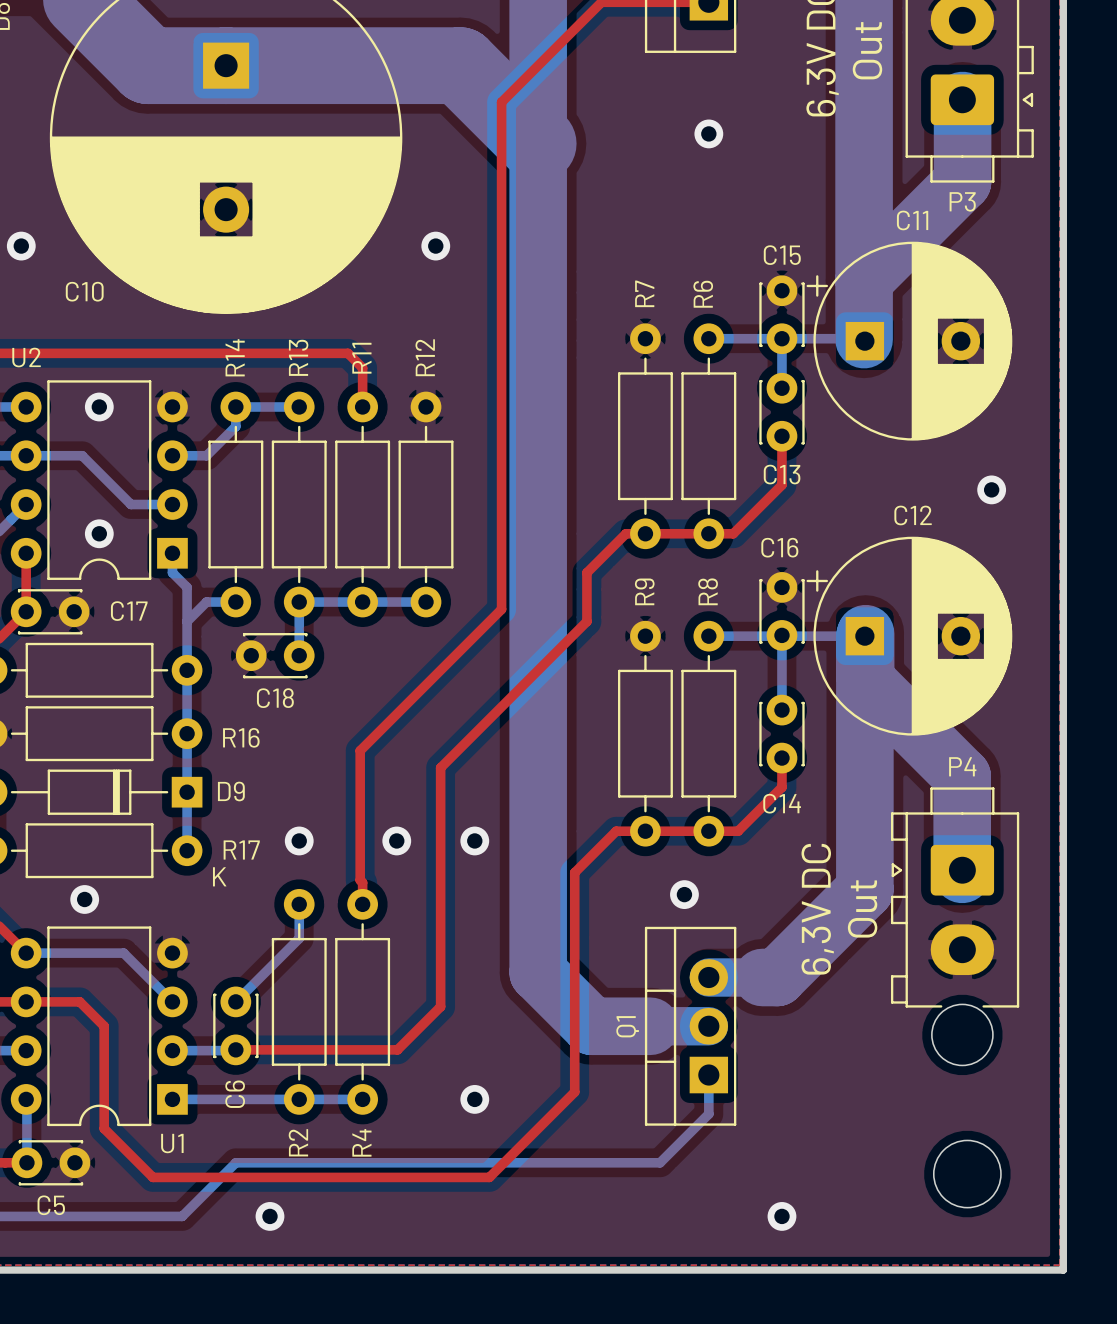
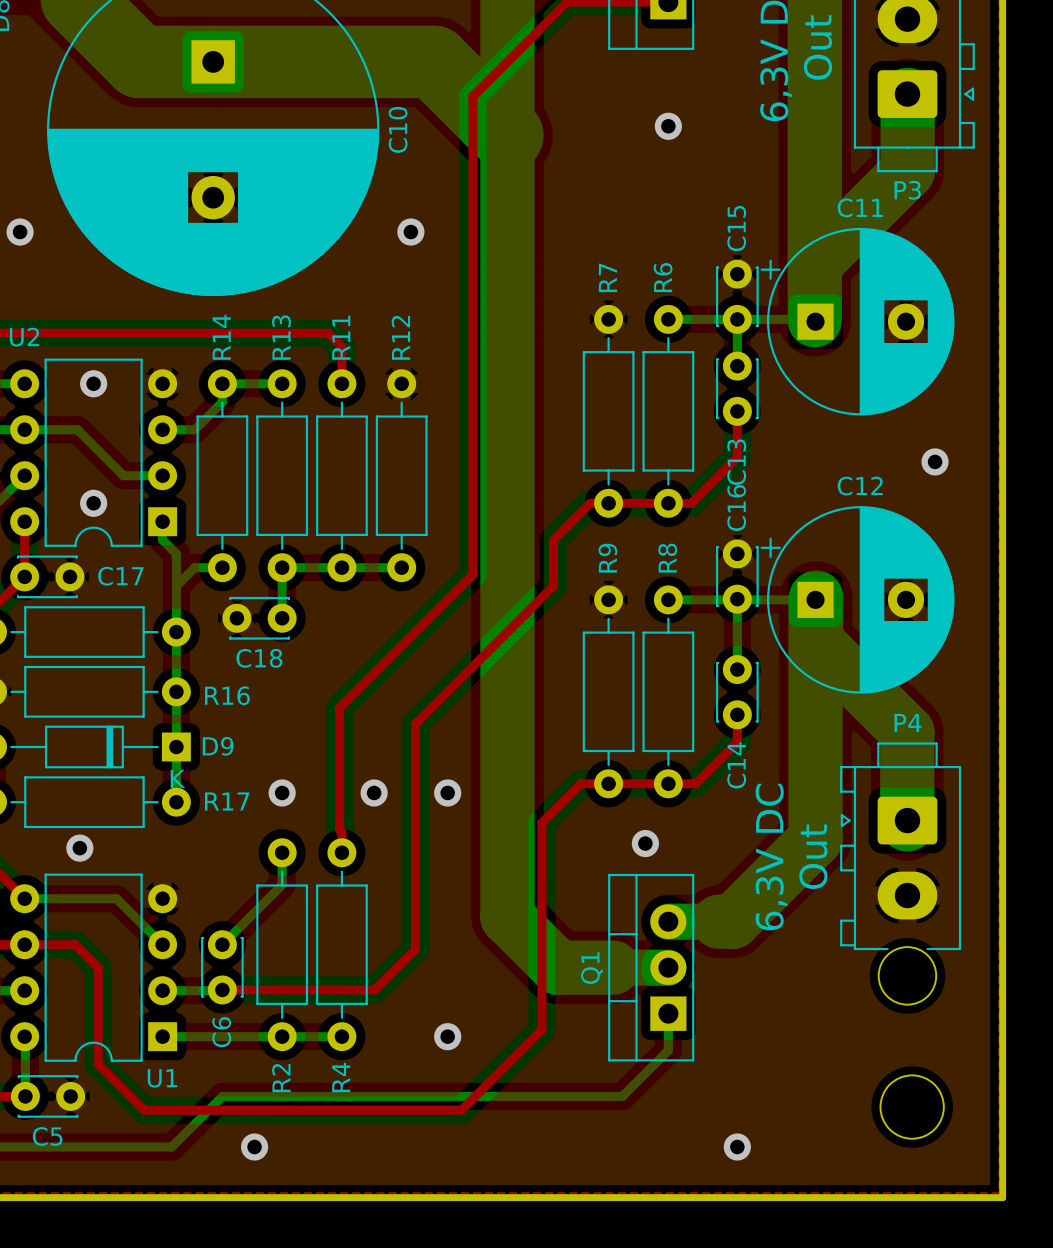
C15 name rotation: 0° (782, 255) -> 90° counterclockwise (736, 228)
C10 name rotation: 0° (84, 291) -> 90° counterclockwise (398, 129)
C10 name position: C10 (84, 291) -> C10 (398, 129)
C13 name rotation: 0° (782, 474) -> 90° counterclockwise (736, 462)
C16 name rotation: 0° (779, 547) -> 90° counterclockwise (736, 507)
C14 name rotation: 0° (782, 803) -> 90° counterclockwise (736, 765)
D9 text position: K (219, 876) -> K (177, 778)

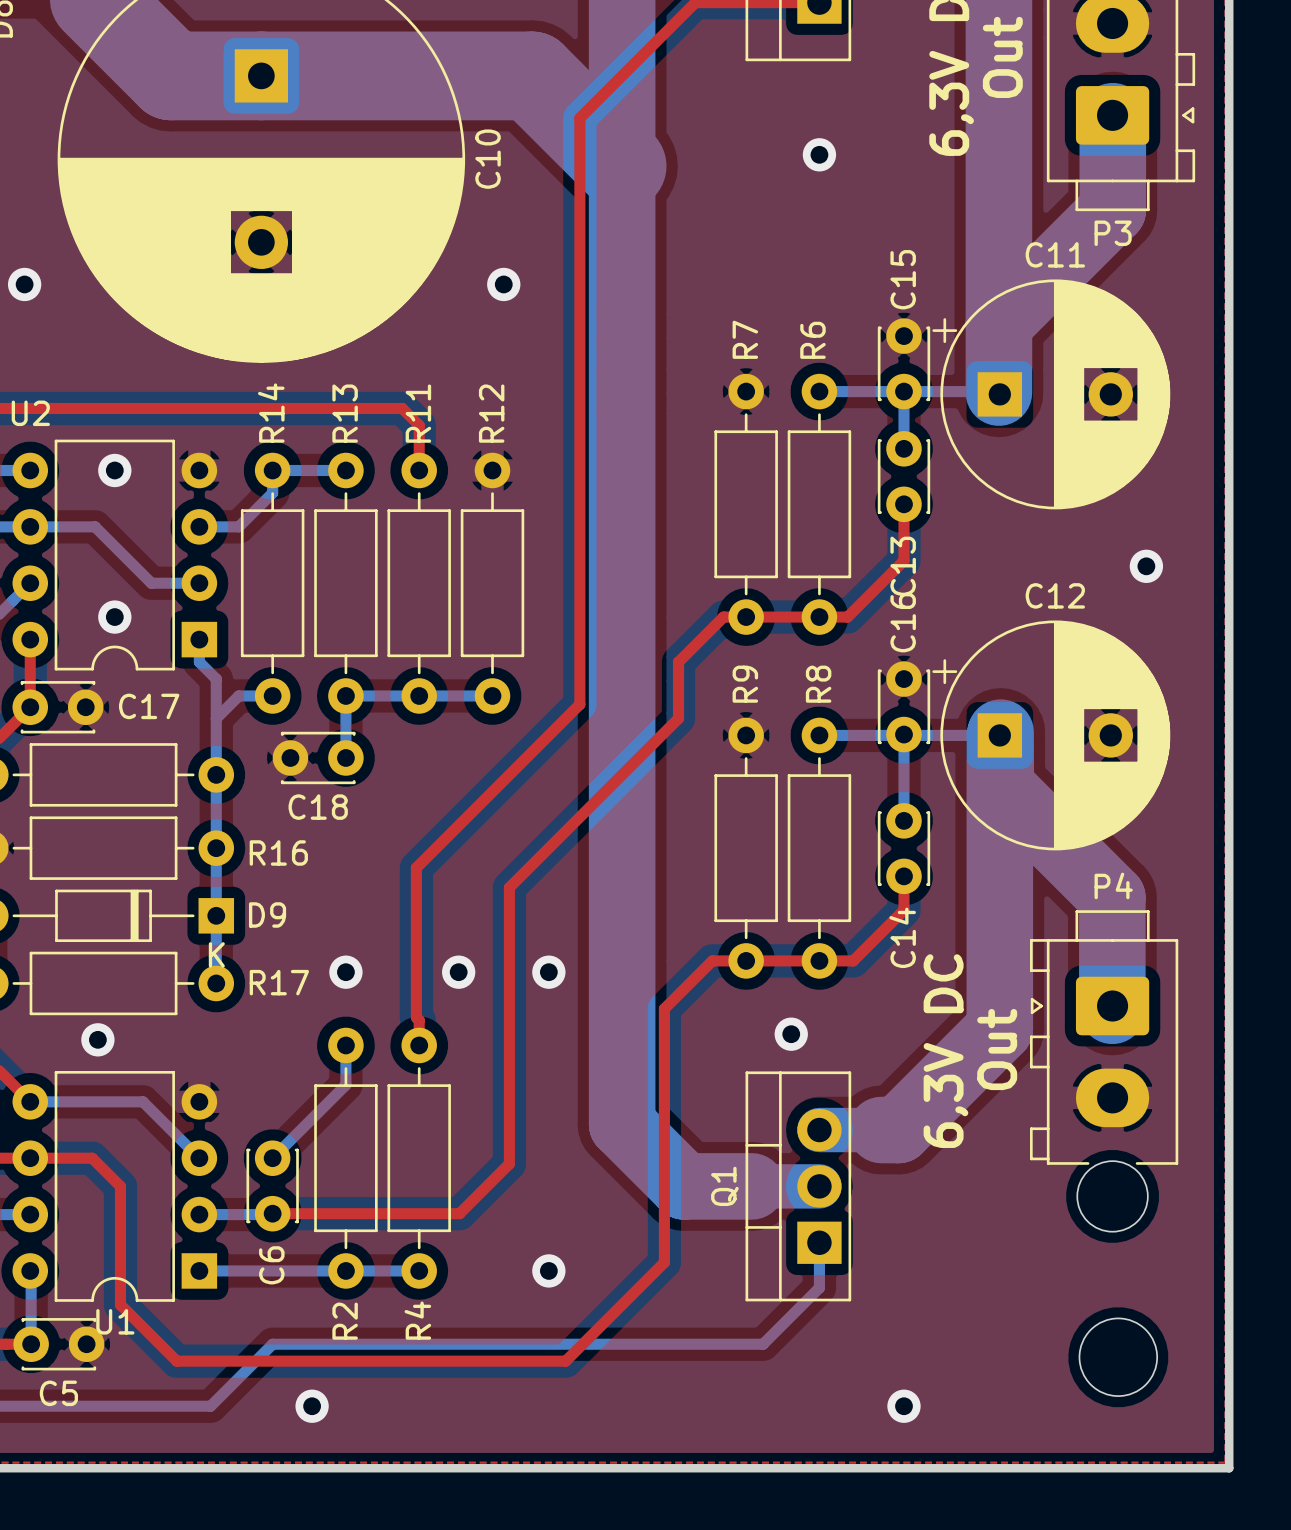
U1 name position: U1 (162, 1078) -> U1 (115, 1321)

